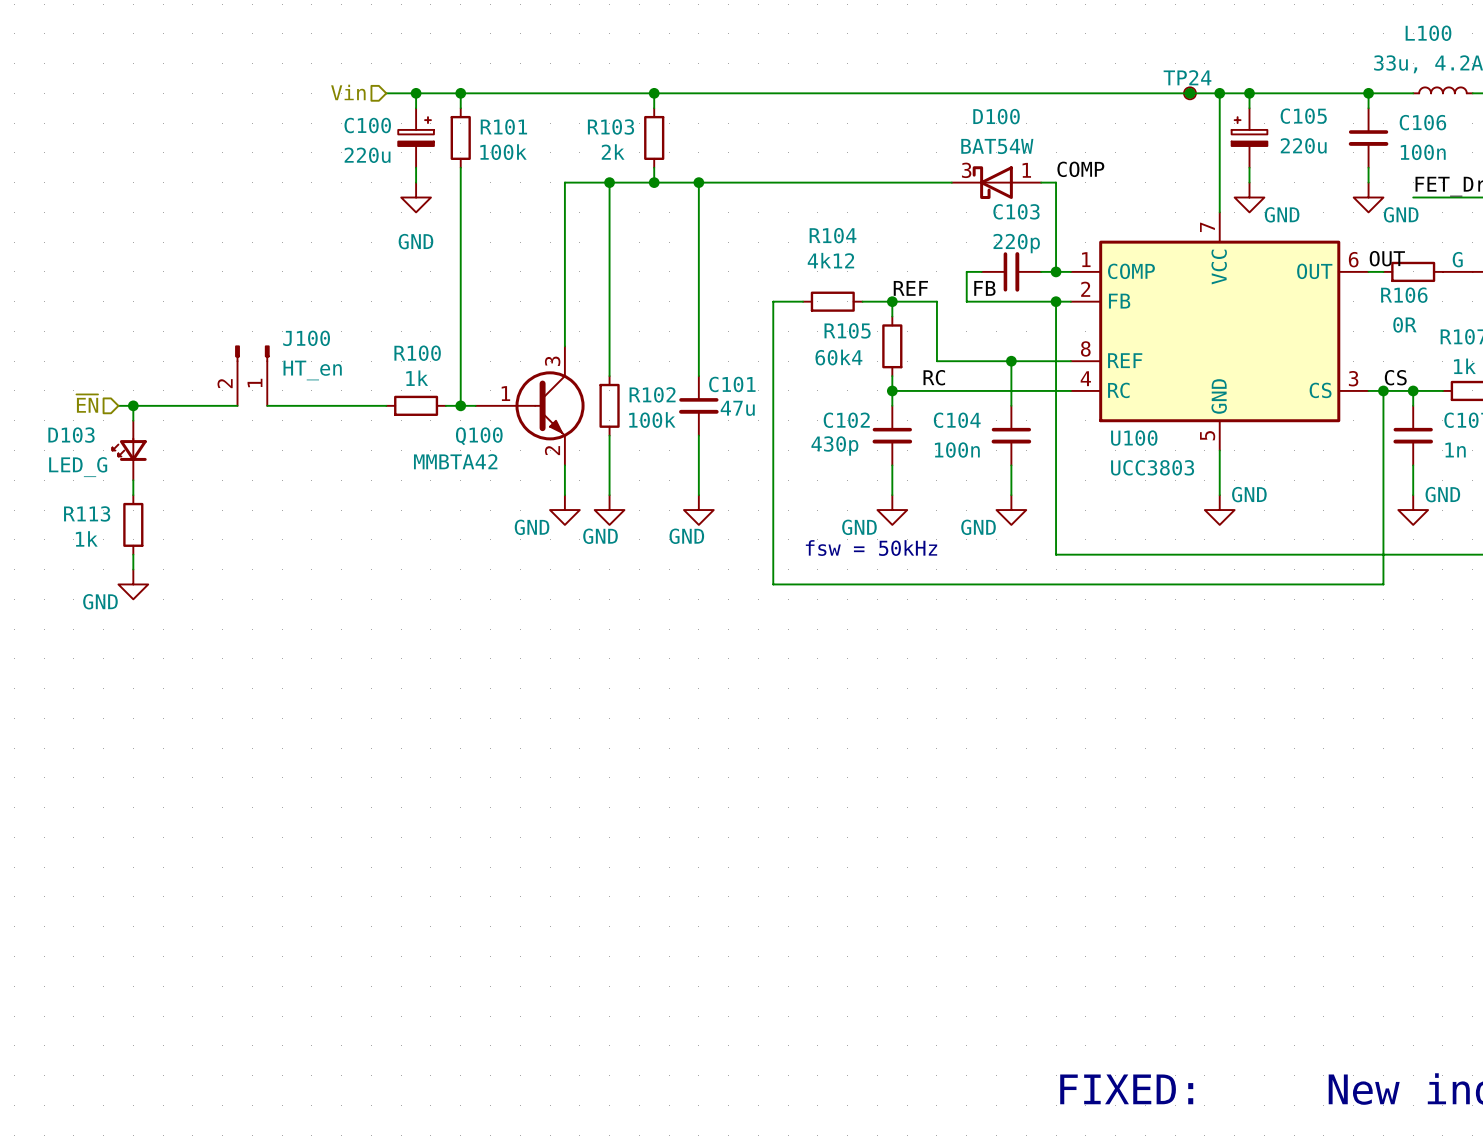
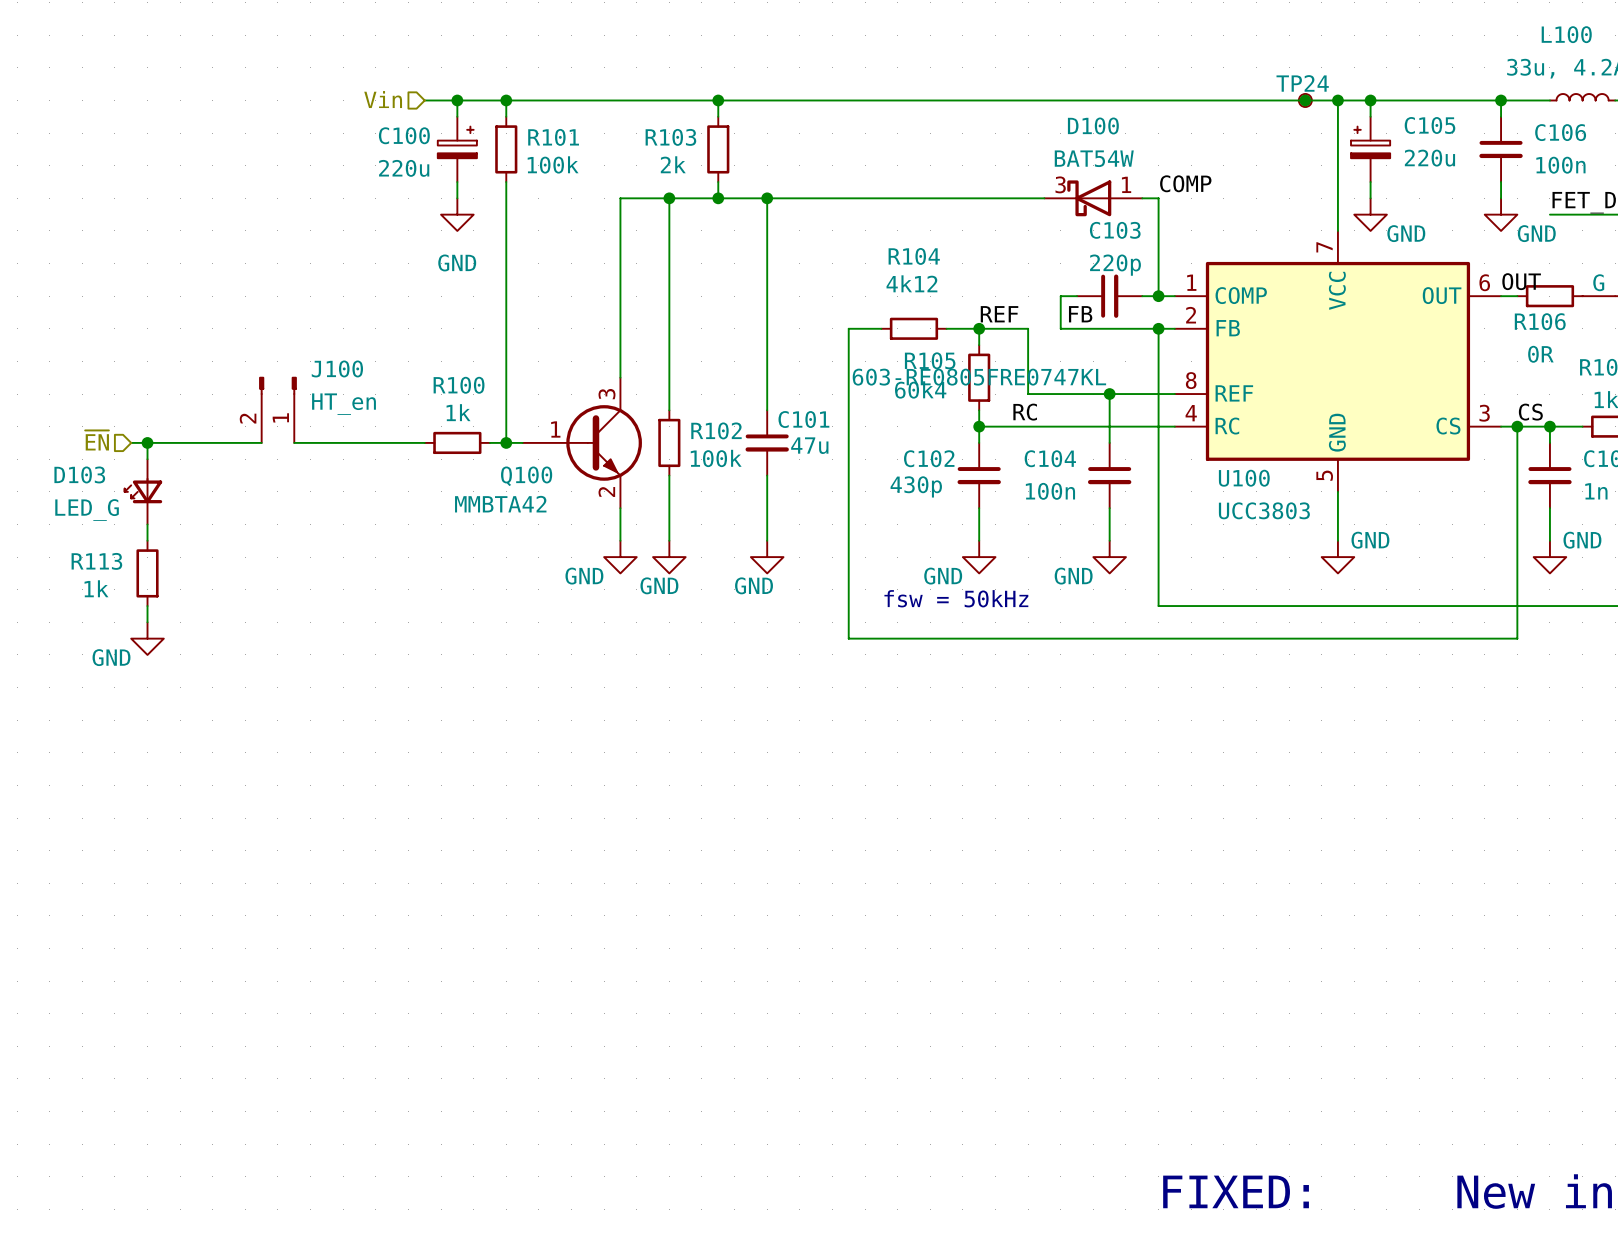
R105 text: none -> 603-RE0805FRE0747KL (979, 377)

